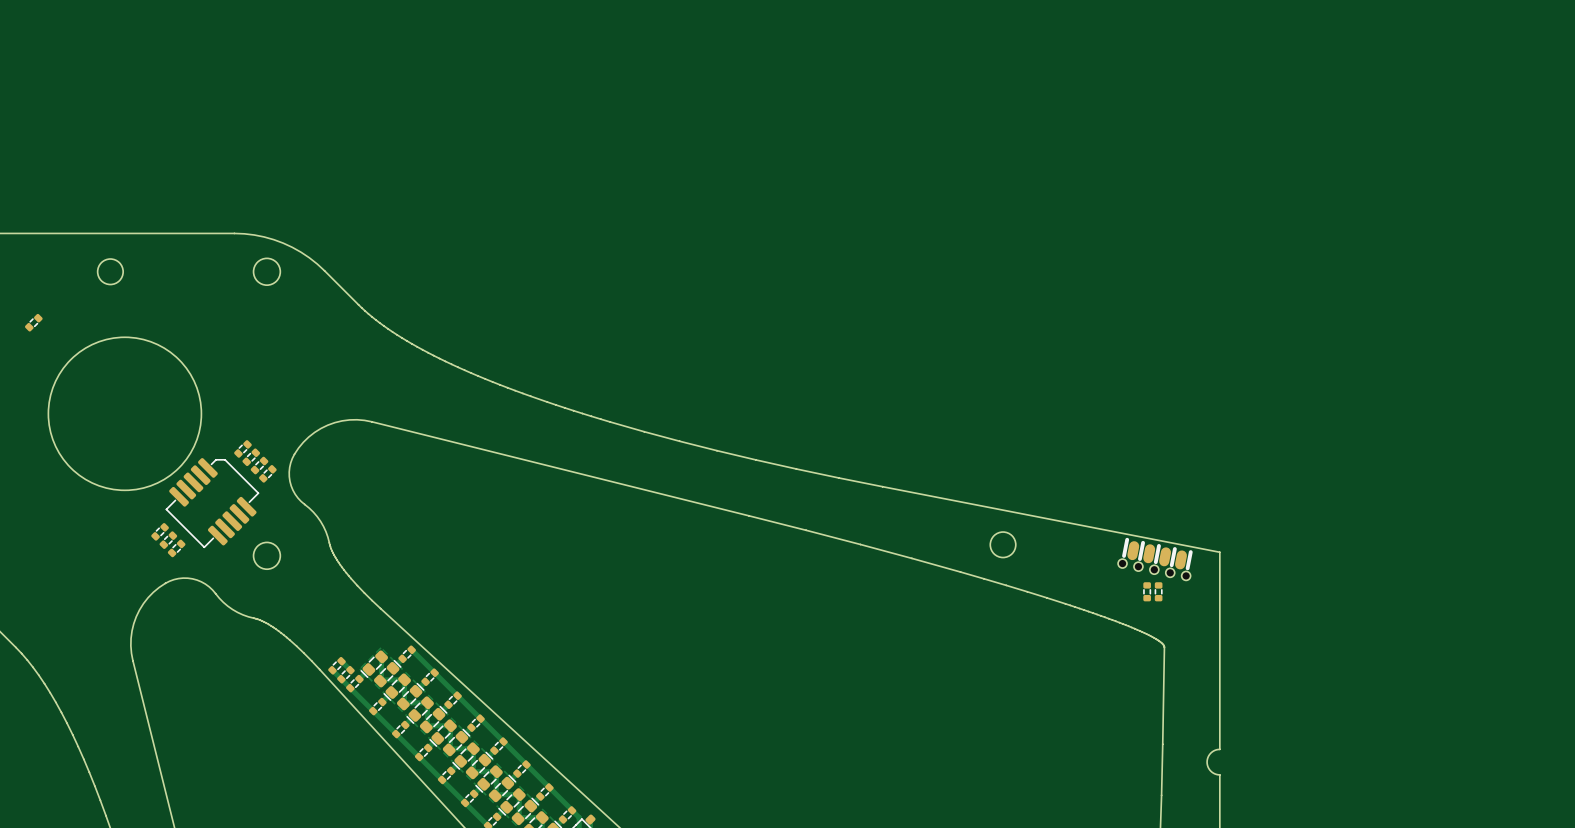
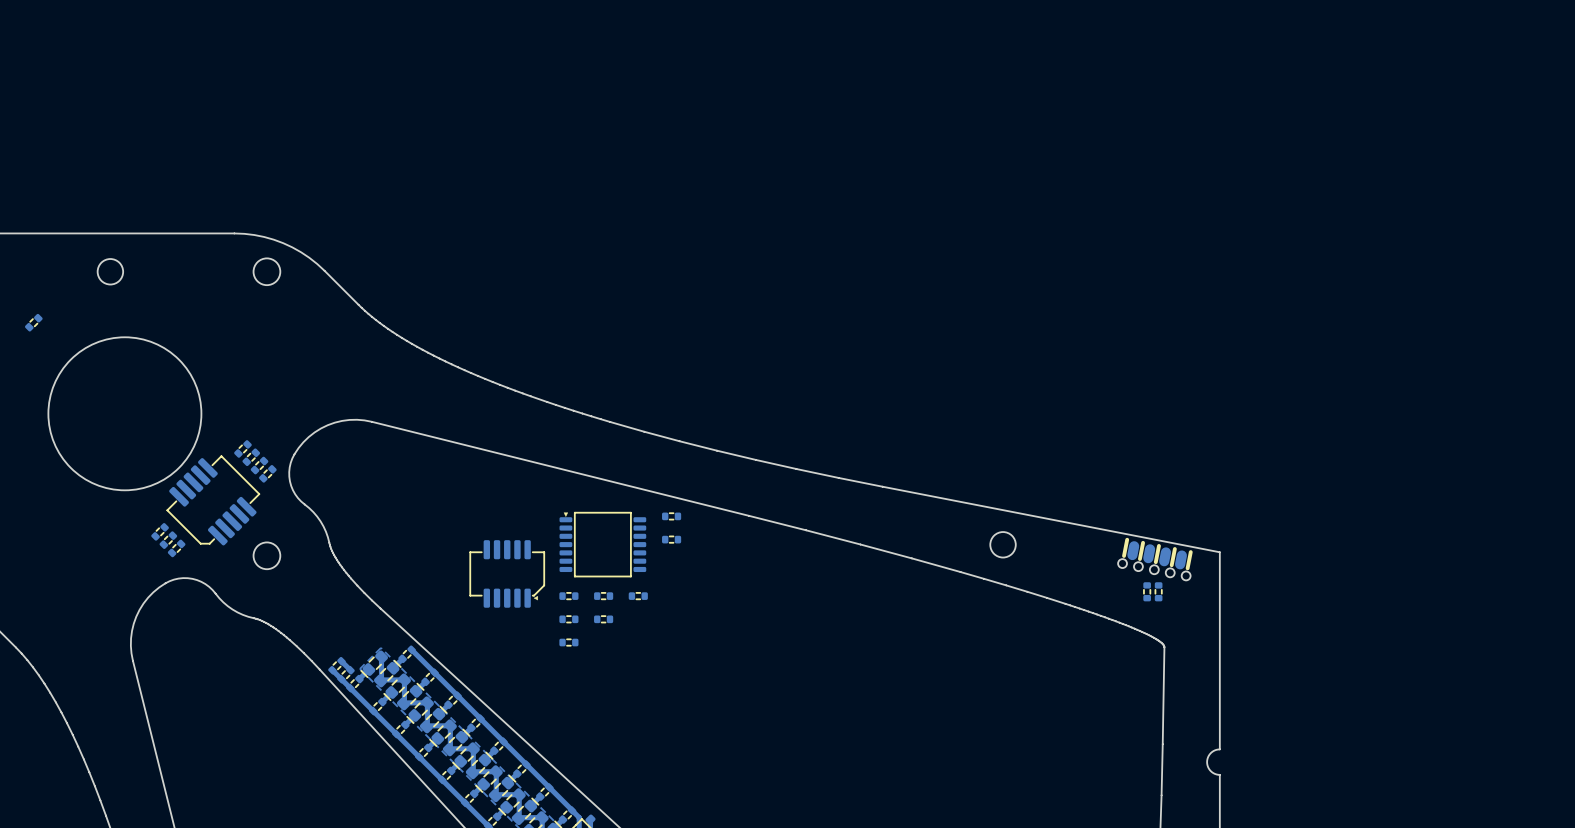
part rotation: 0° (212, 503) -> 180° (213, 500)
part: none -> (671, 516)
part: none -> (671, 539)
part: none -> (602, 544)
part: none -> (507, 573)
part: none -> (568, 596)
part: none -> (603, 596)
part: none -> (638, 596)
part: none -> (568, 619)
part: none -> (603, 619)
part: none -> (568, 642)

